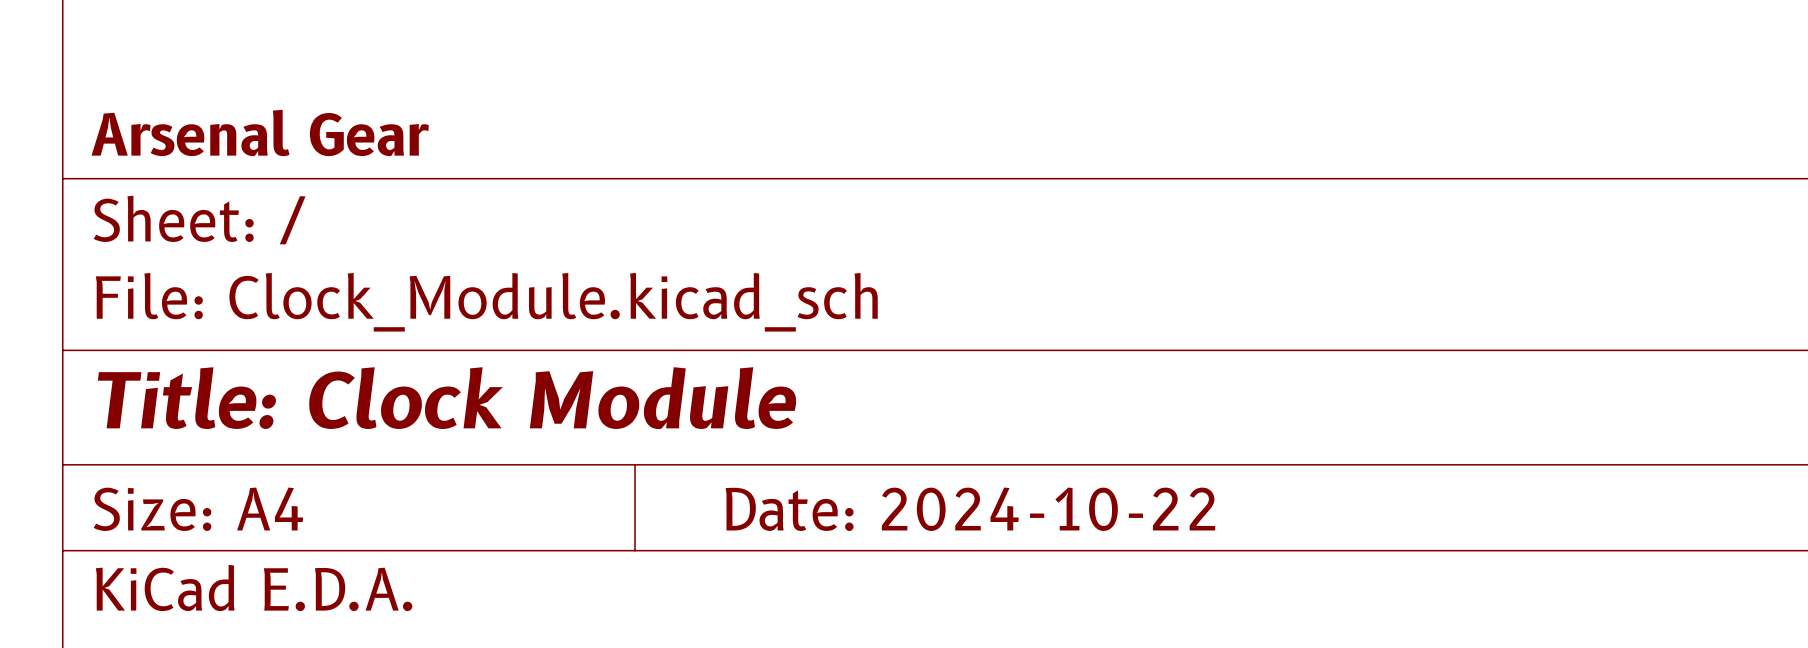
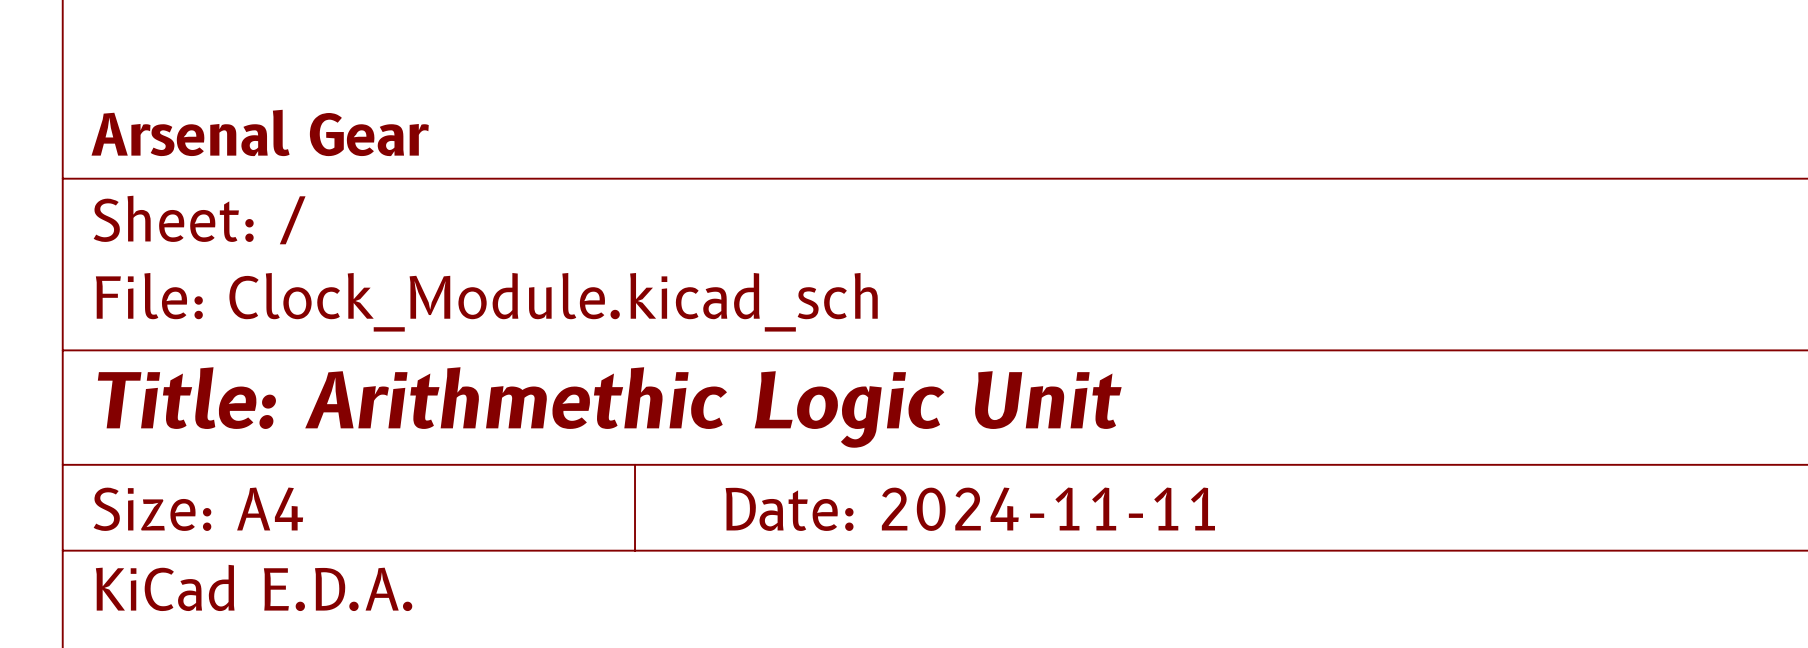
title block: Title: Clock Module (447, 398) -> Title: Arithmethic Logic Unit (609, 407)
title block: Date: 2024-10-22 (970, 509) -> Date: 2024-11-11 (970, 509)

